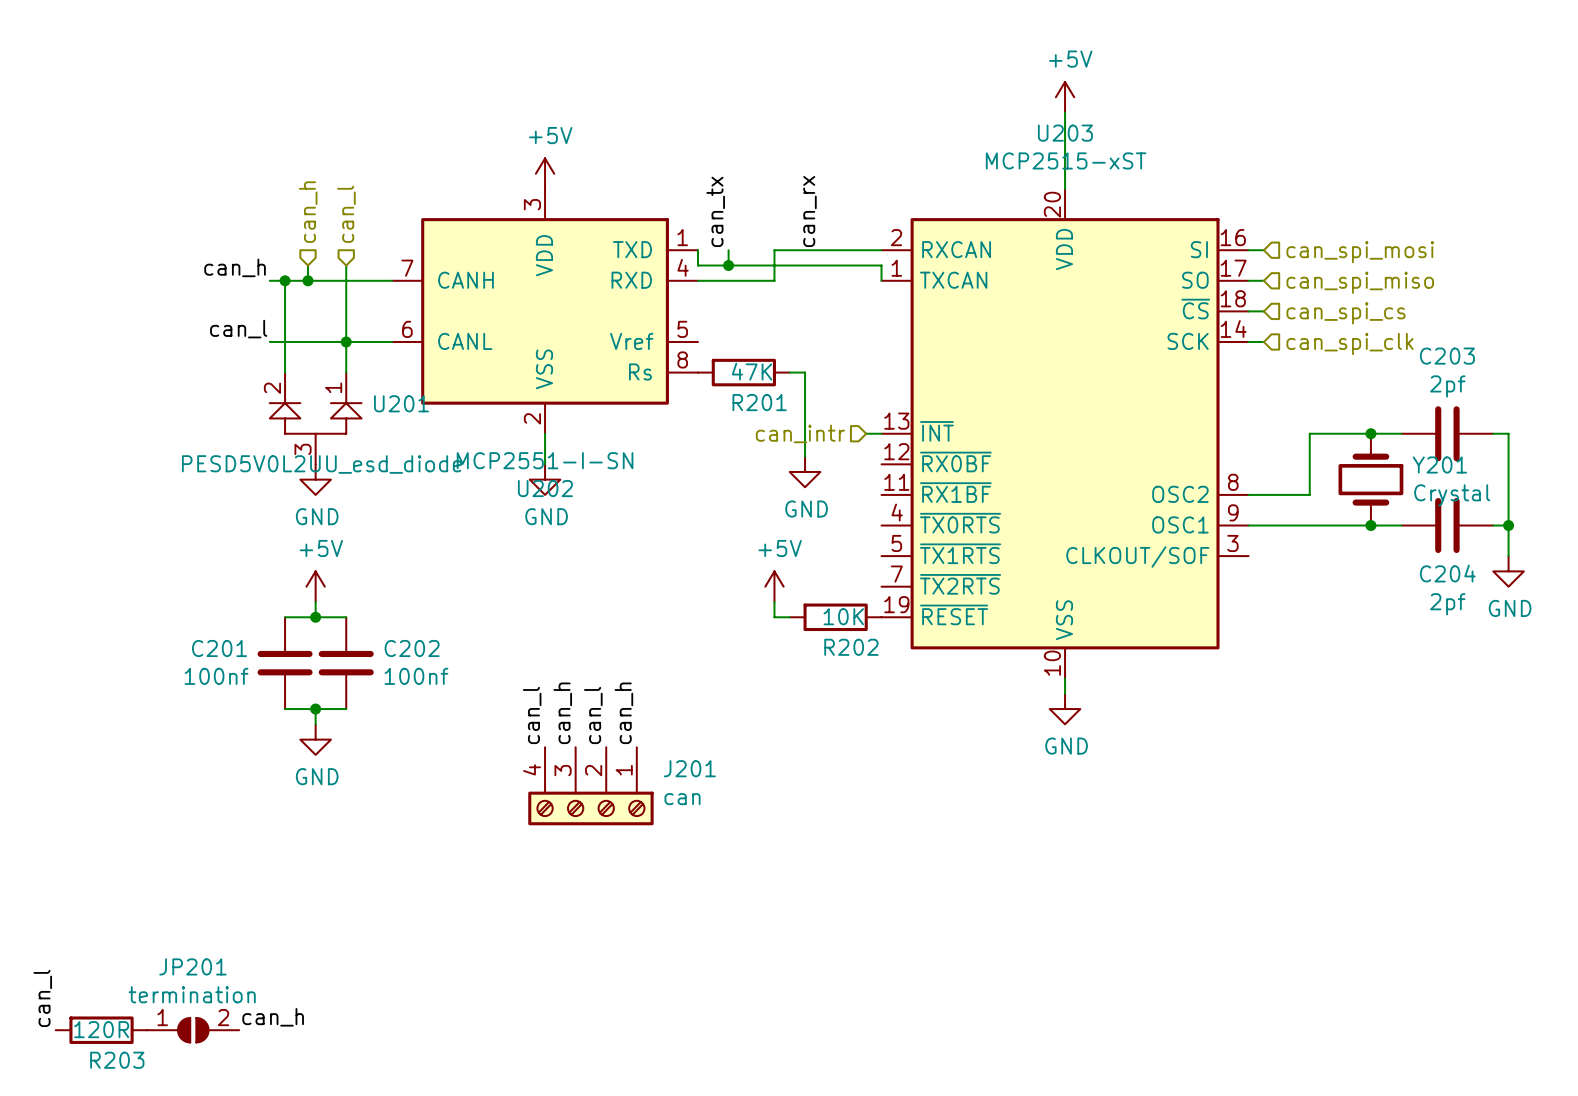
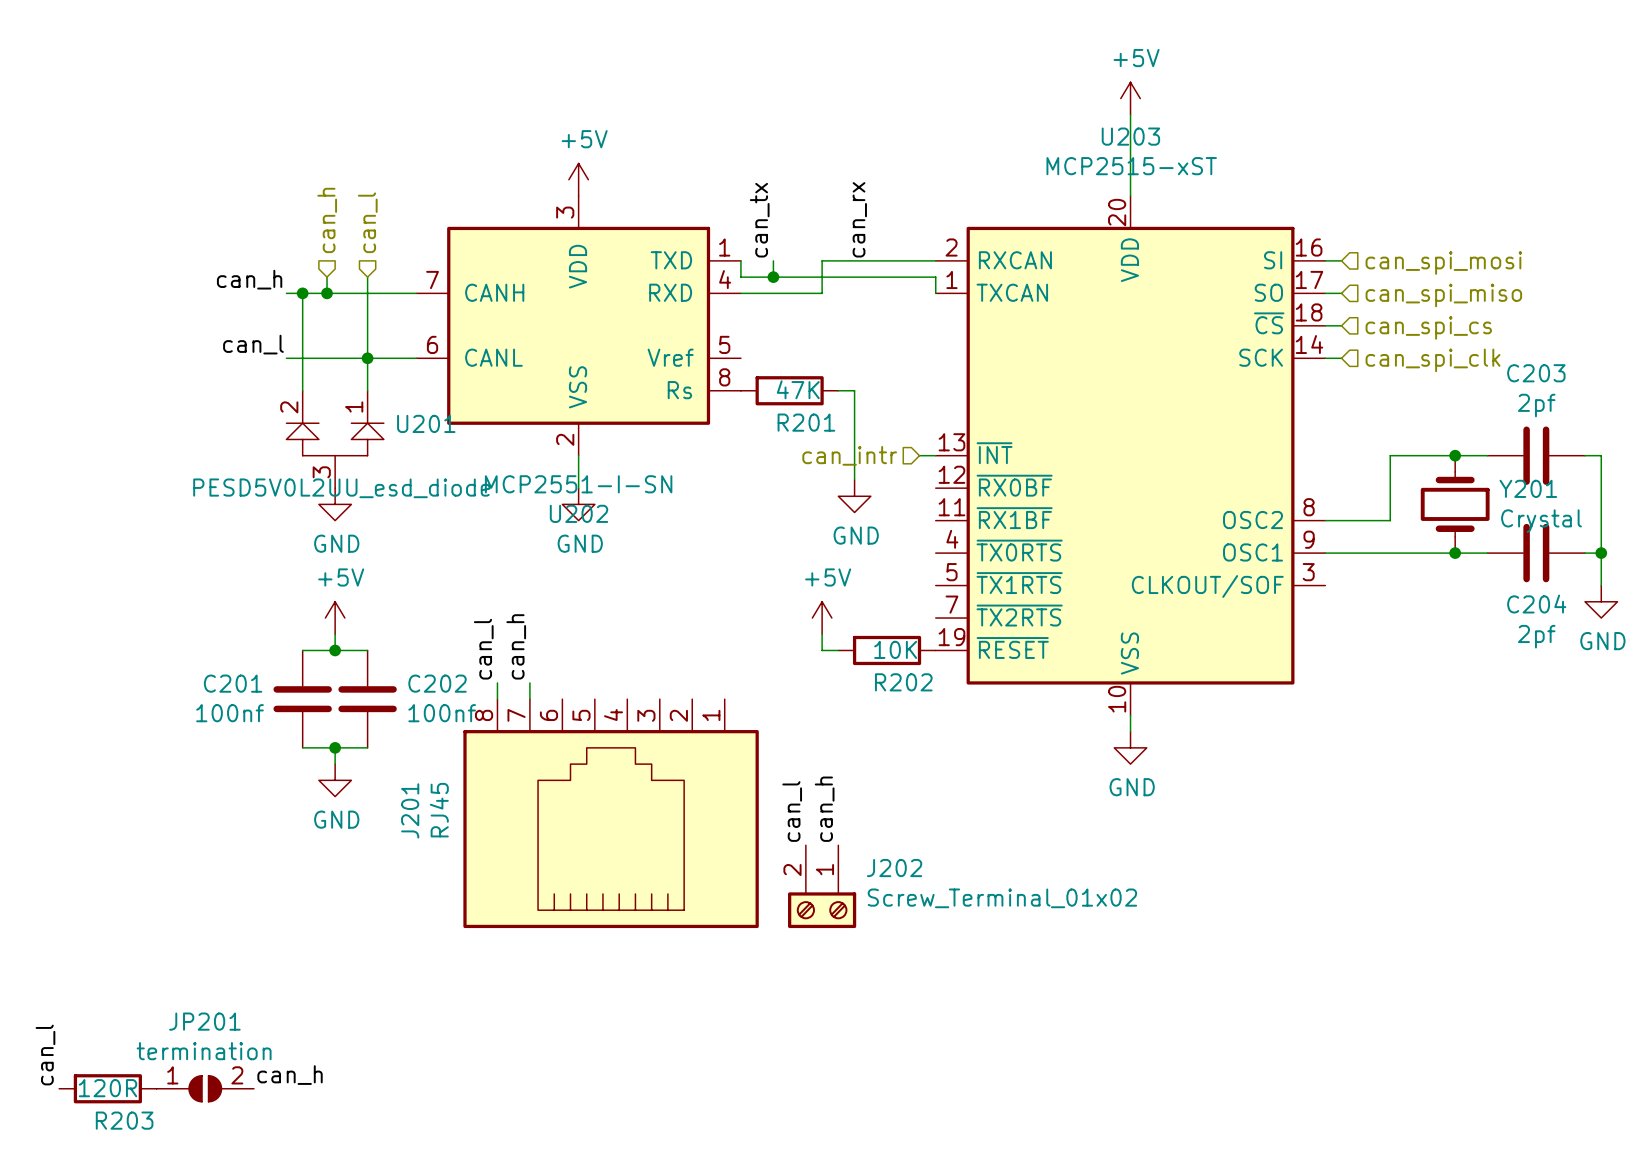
label: none -> can_h (516, 646)
label: none -> can_l (483, 649)
wire: none -> (497, 682) (497, 699)
wire: none -> (529, 682) (529, 699)
label: can_h (562, 713) -> none
label: can_h (623, 713) -> none
label: can_l (532, 715) -> none
label: can_l (593, 715) -> none
J201 symbol: [528, 747, 654, 826] -> [463, 699, 759, 929]
label: none -> can_h (824, 809)
J201 name position: J201 (689, 768) -> J201 (410, 810)
label: none -> can_l (792, 811)
J201 value: can (682, 799) -> RJ45 (439, 810)
J202: none -> Screw_Terminal_01x02 (822, 886)

